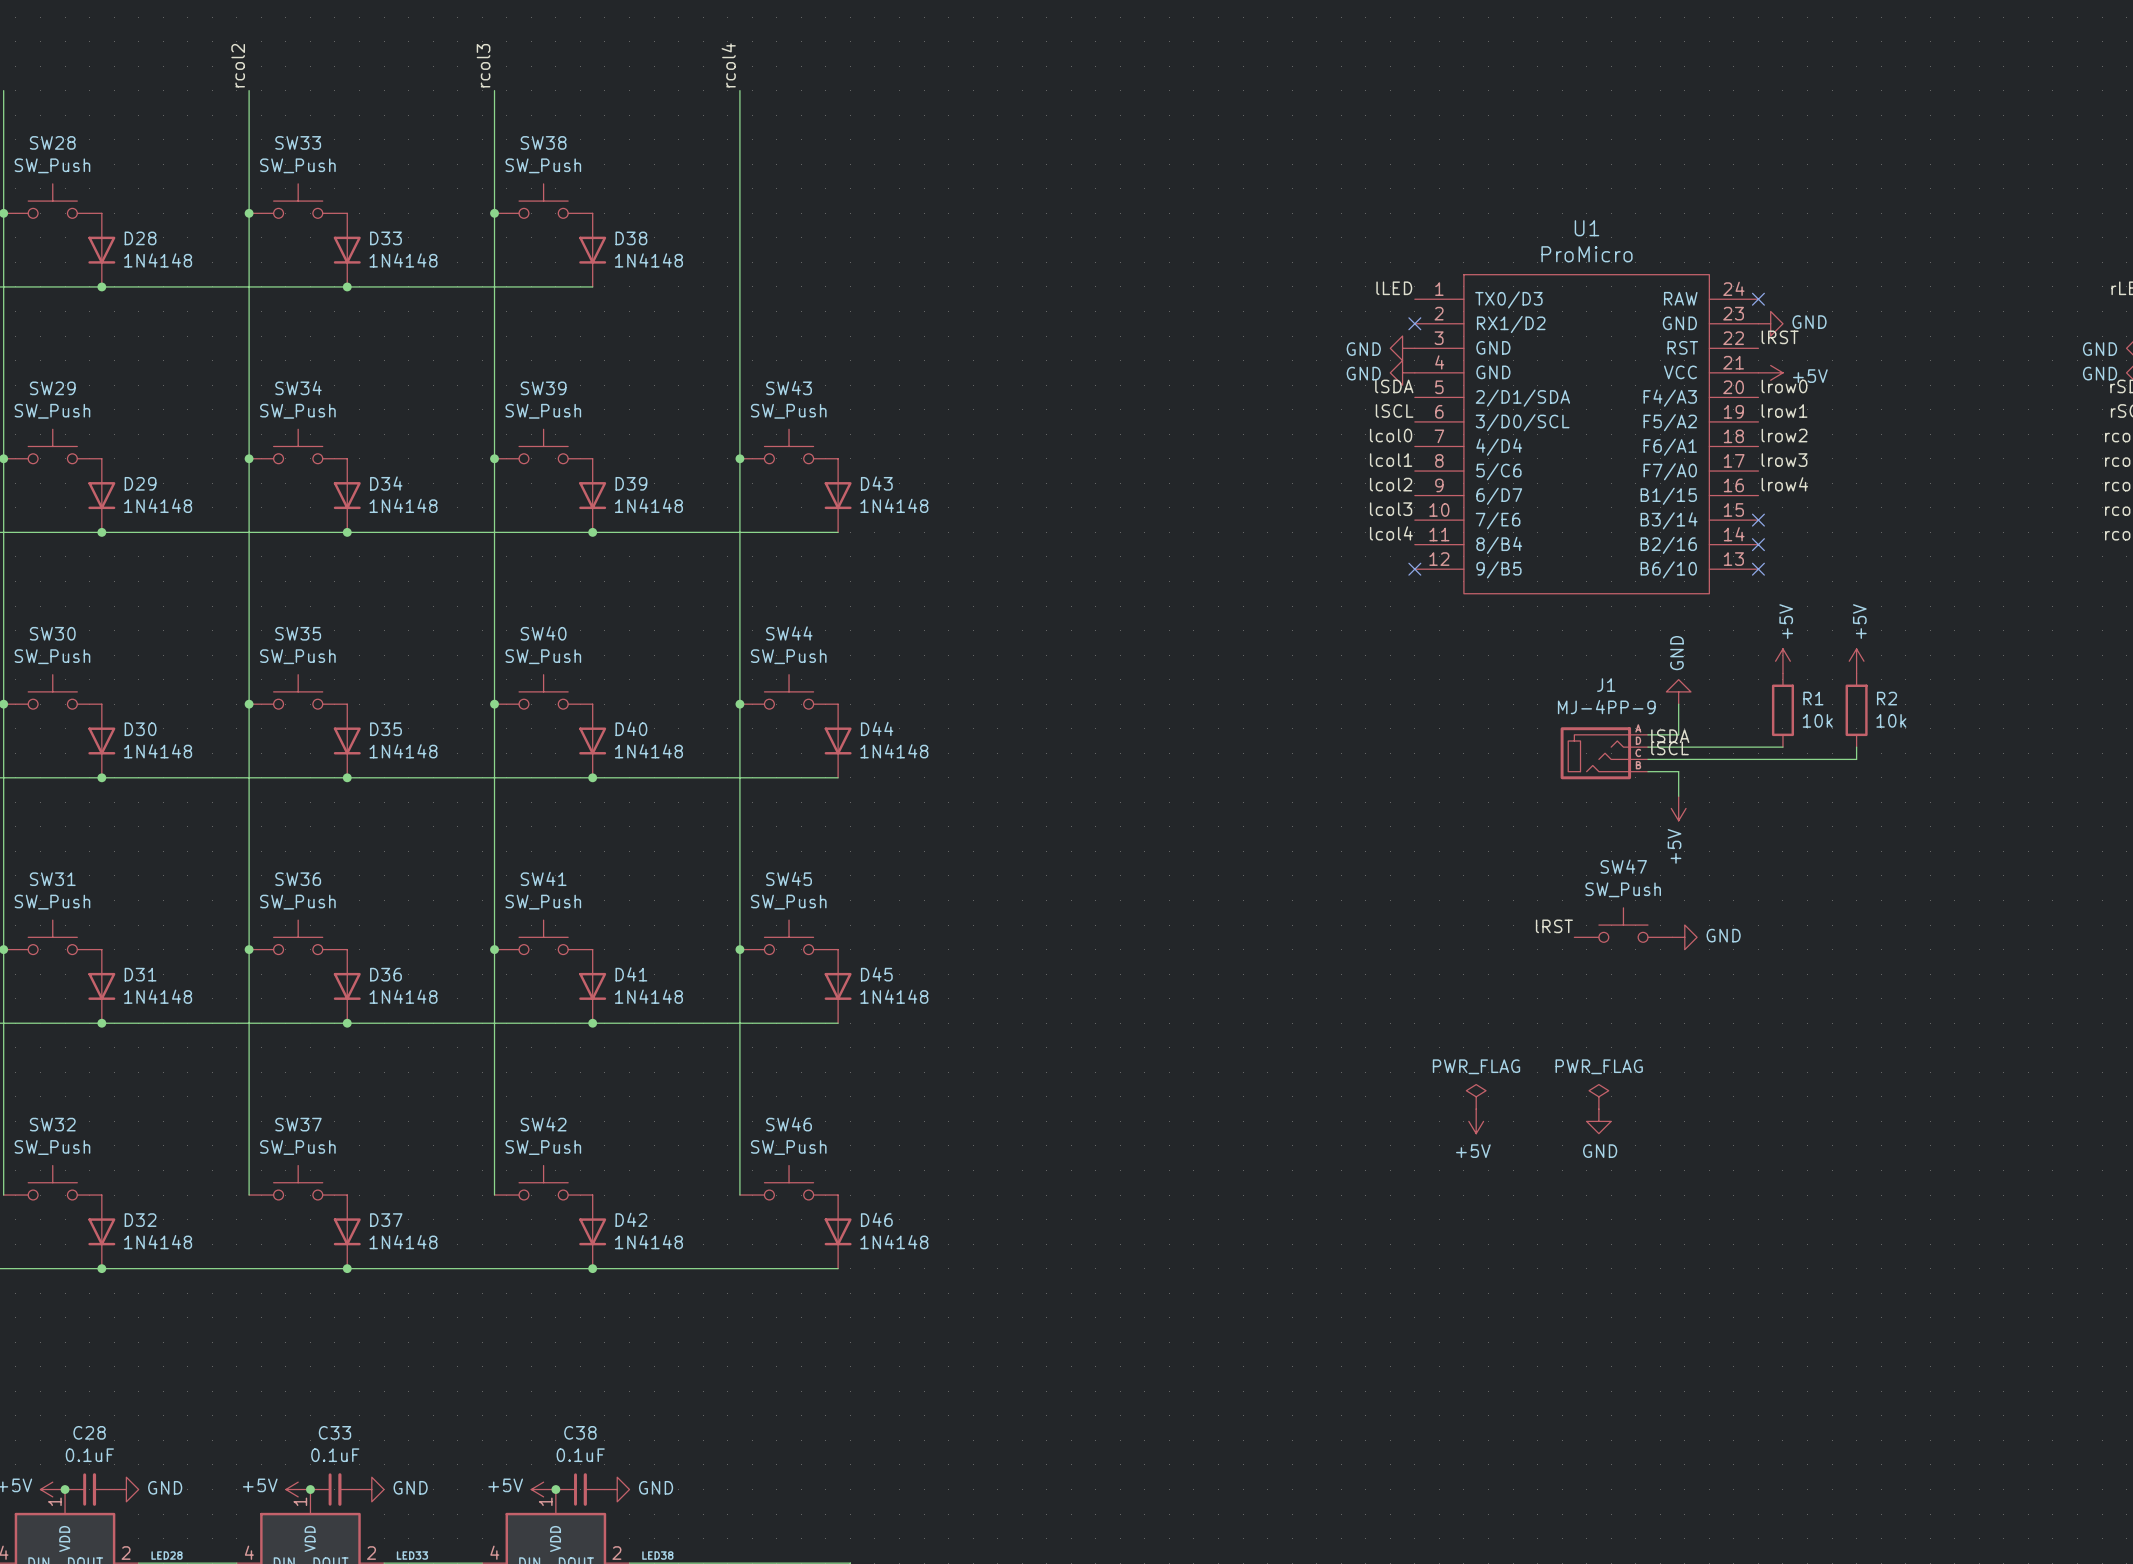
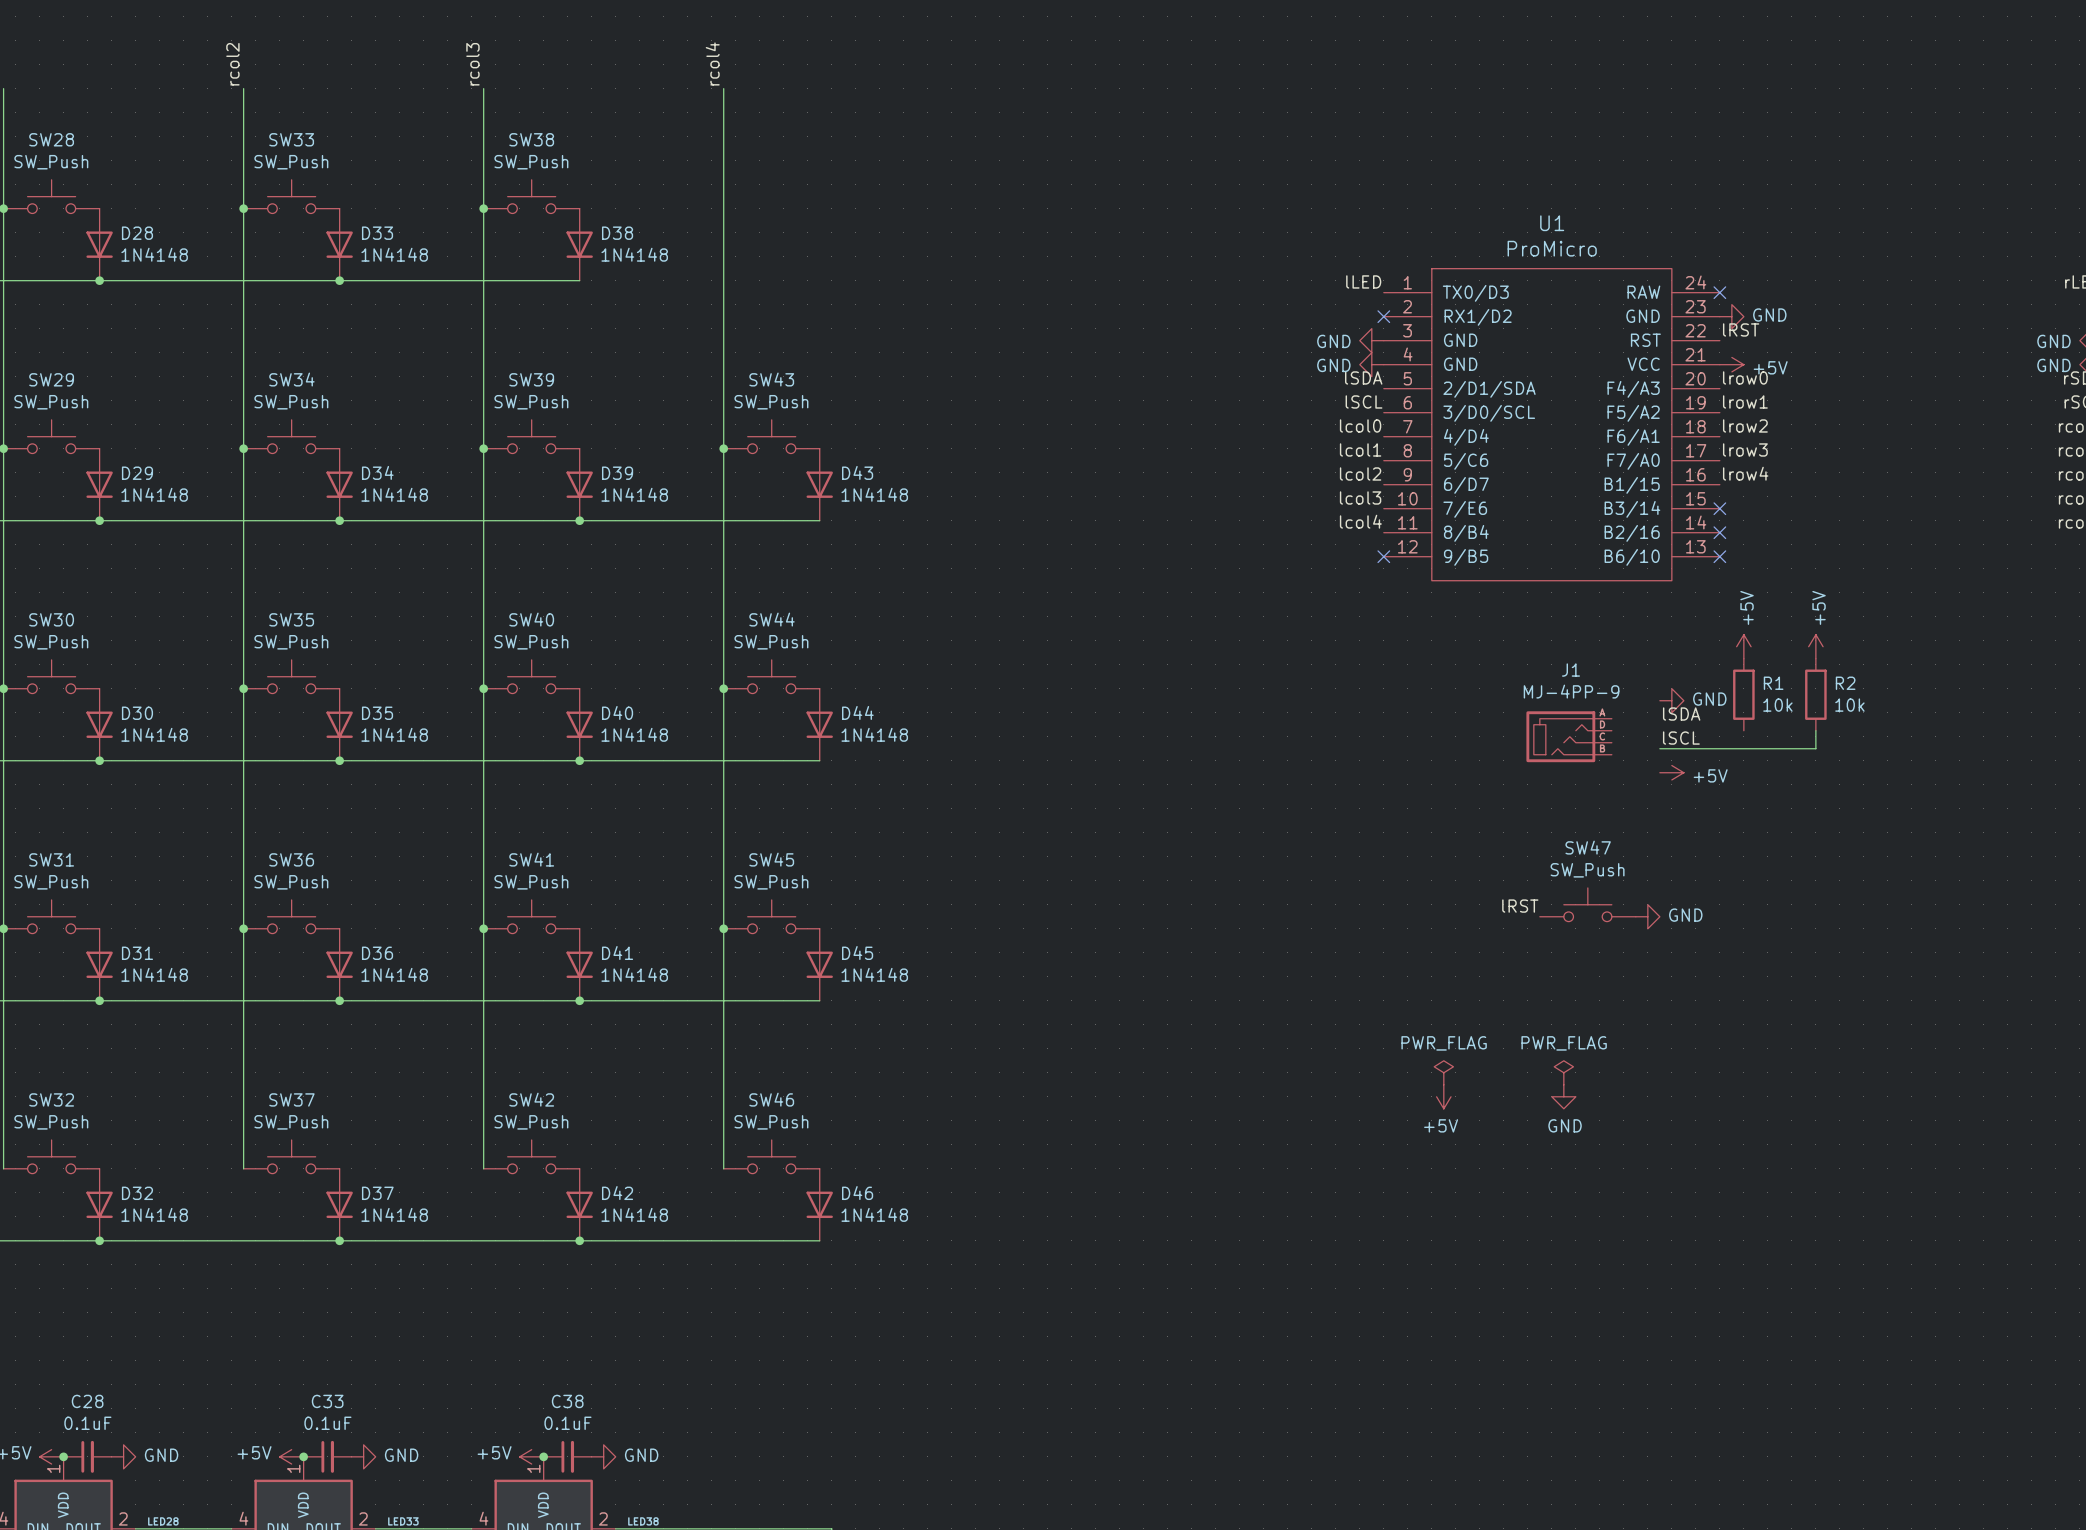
power symbol rotation: 0° (1678, 691) -> 90° clockwise (1671, 700)
power symbol position: GND (1678, 691) -> GND (1671, 700)
wire: (1678, 704) (1678, 734) (1647, 734) -> none
label position: lSDA (1670, 736) -> lSDA (1681, 714)
wire: (1647, 747) (1782, 747) -> none
label position: lSCL (1669, 748) -> lSCL (1681, 738)
wire: (1647, 759) (1856, 759) -> (1659, 748) (1815, 748) (1815, 742)
wire: (1647, 771) (1678, 771) (1678, 796) -> none
power symbol rotation: 0° (1678, 808) -> 90° counterclockwise (1671, 772)
power symbol position: +5V (1678, 808) -> +5V (1671, 772)

